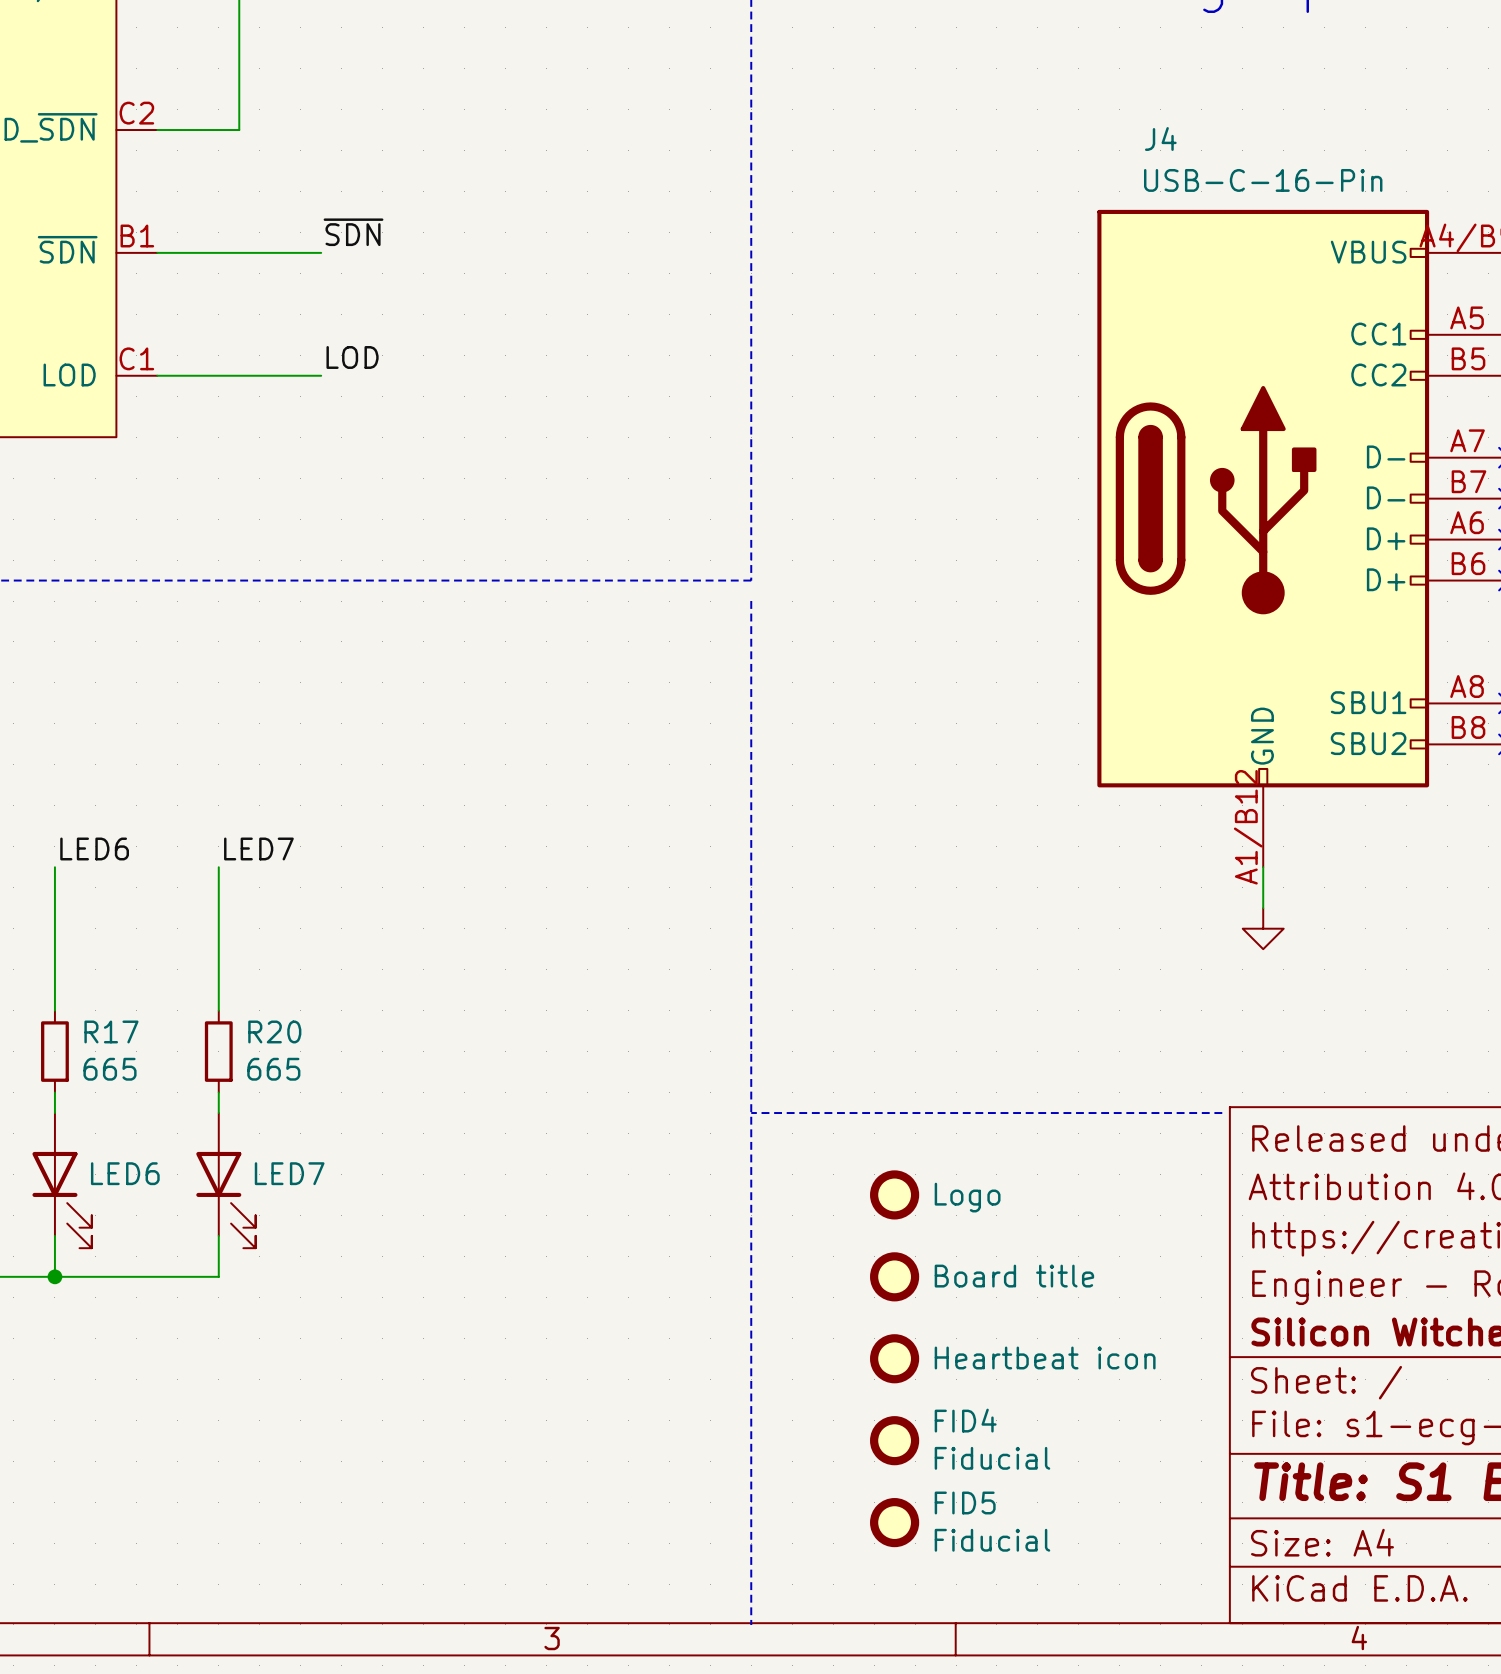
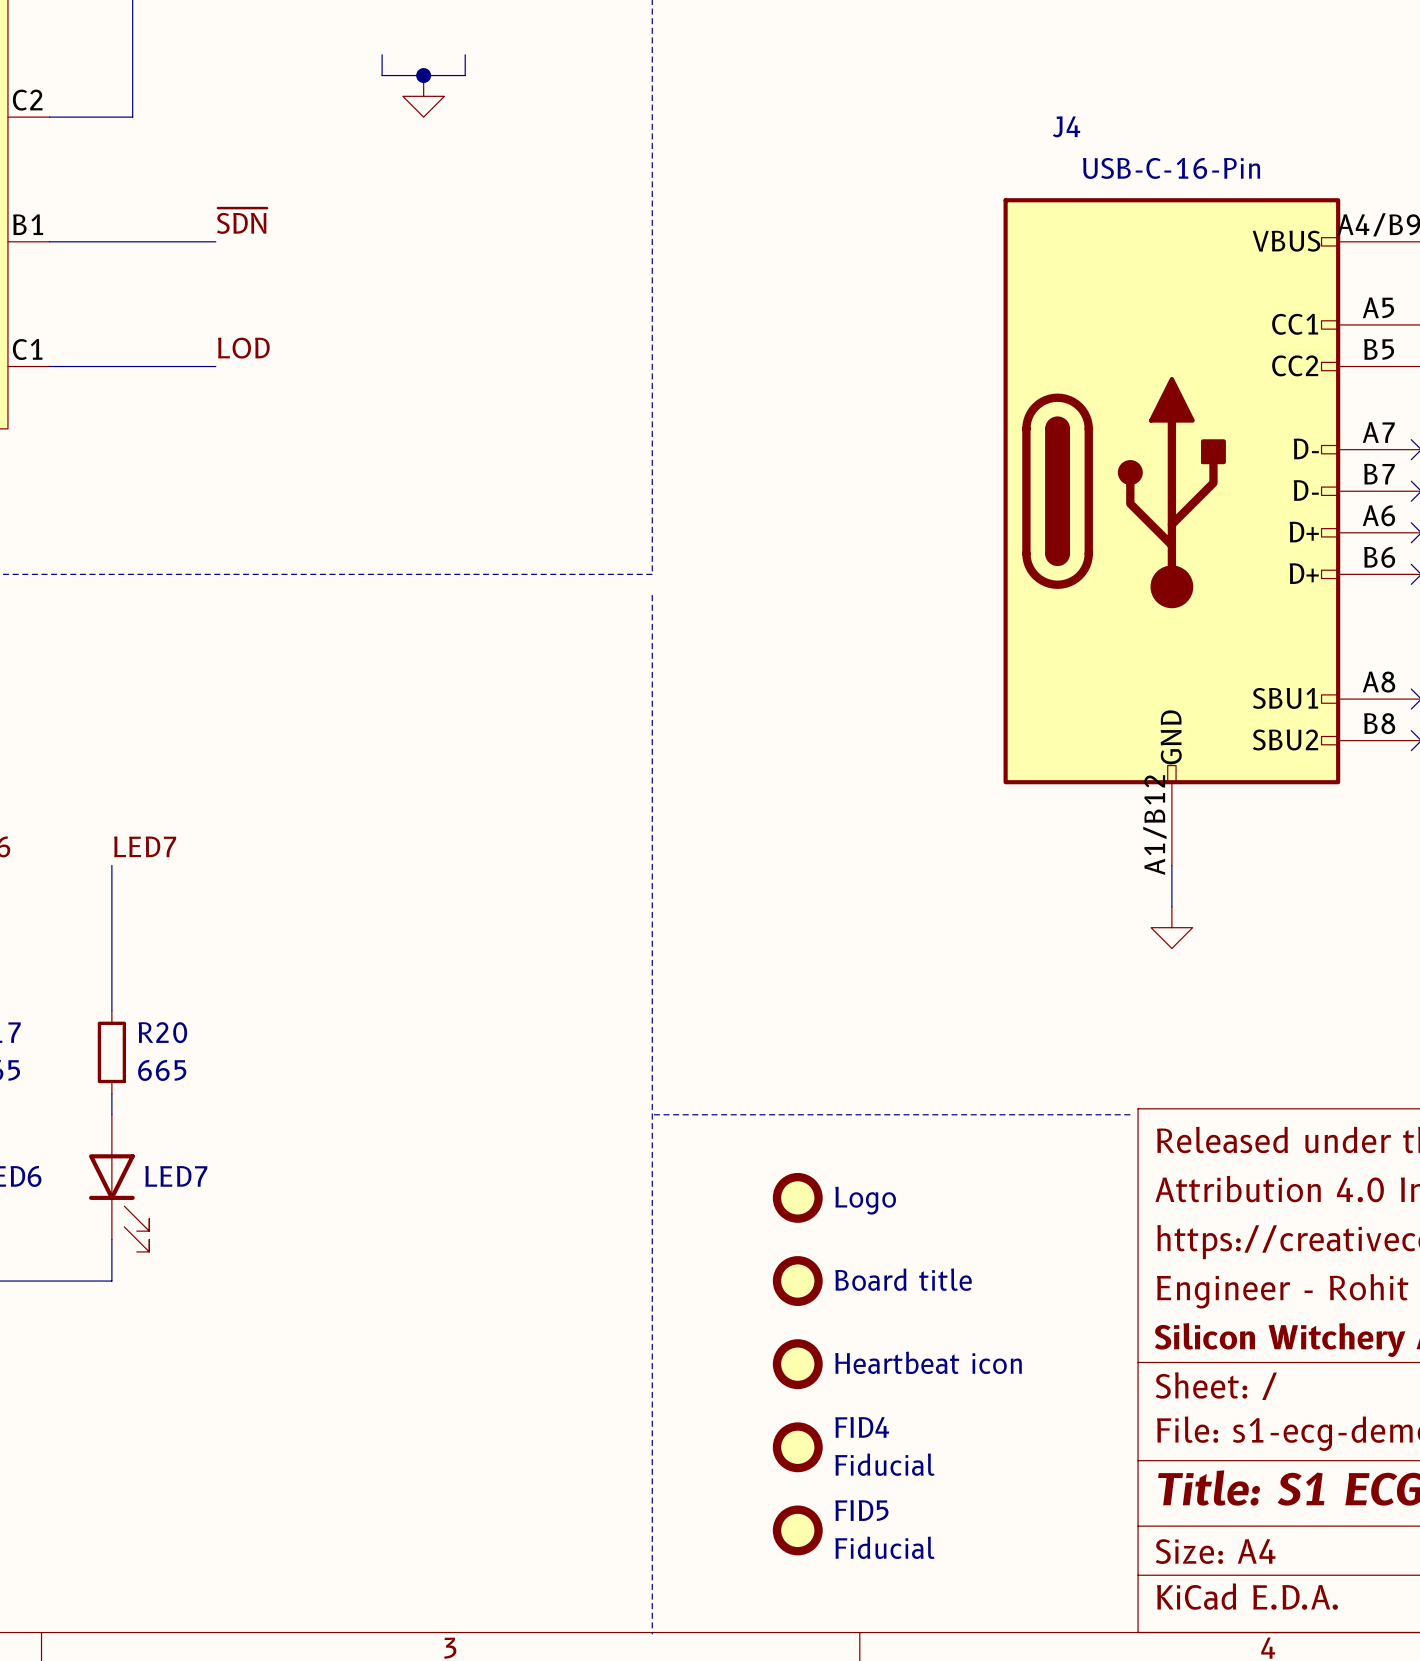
wire: none -> (382, 54) (382, 75) (465, 75) (465, 54)
junction: none -> (423, 75)
power symbol: none -> (423, 96)

